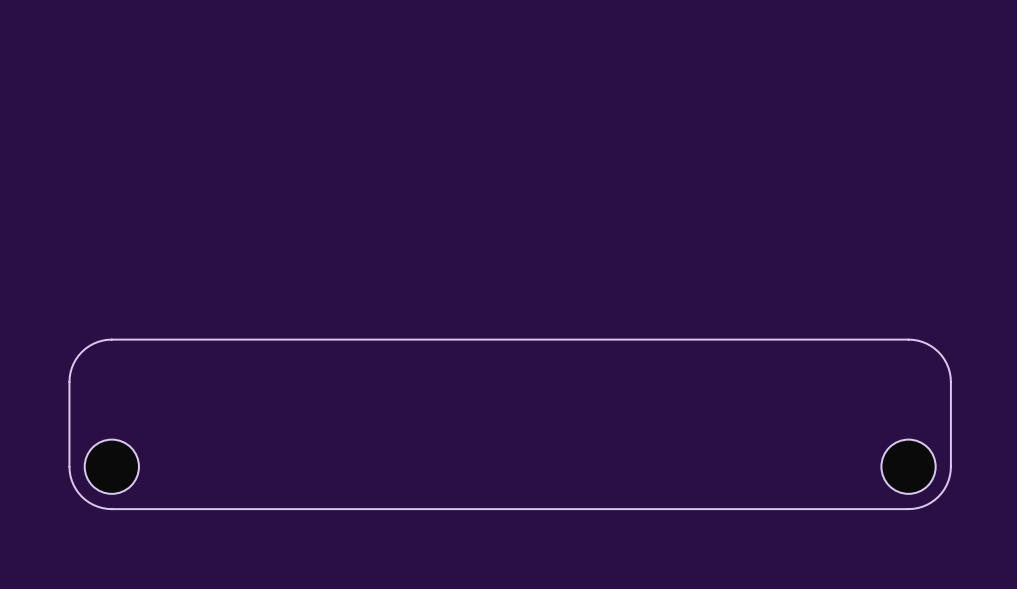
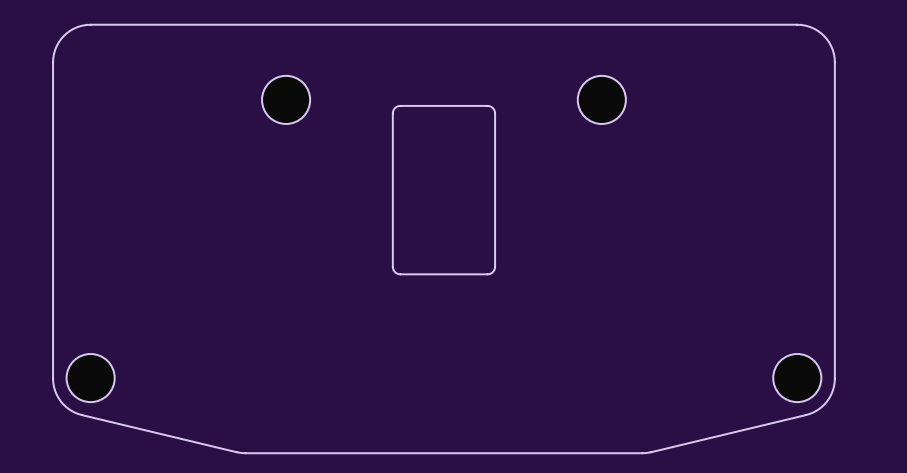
part: none -> (286, 99)
part: none -> (601, 99)
board edge: none -> (487, 105) (400, 105) (393, 109) (392, 266) (396, 273) (487, 274) (494, 270) (495, 113) (492, 108) (487, 105)
board edge: (950, 381) (948, 367) (938, 352) (926, 343) (908, 339) (111, 339) (97, 341) (81, 352) (73, 363) (69, 381) -> (834, 302) (834, 58) (831, 46) (820, 32) (809, 26) (797, 24) (90, 24) (78, 26) (61, 38) (53, 58) (53, 302)
board edge: (950, 466) (946, 485) (938, 496) (922, 506) (908, 509) (111, 509) (97, 506) (81, 496) (73, 485) (69, 466) -> (834, 378) (829, 398) (820, 407) (810, 413) (642, 453) (241, 452) (77, 413) (66, 407) (58, 398) (53, 378)

